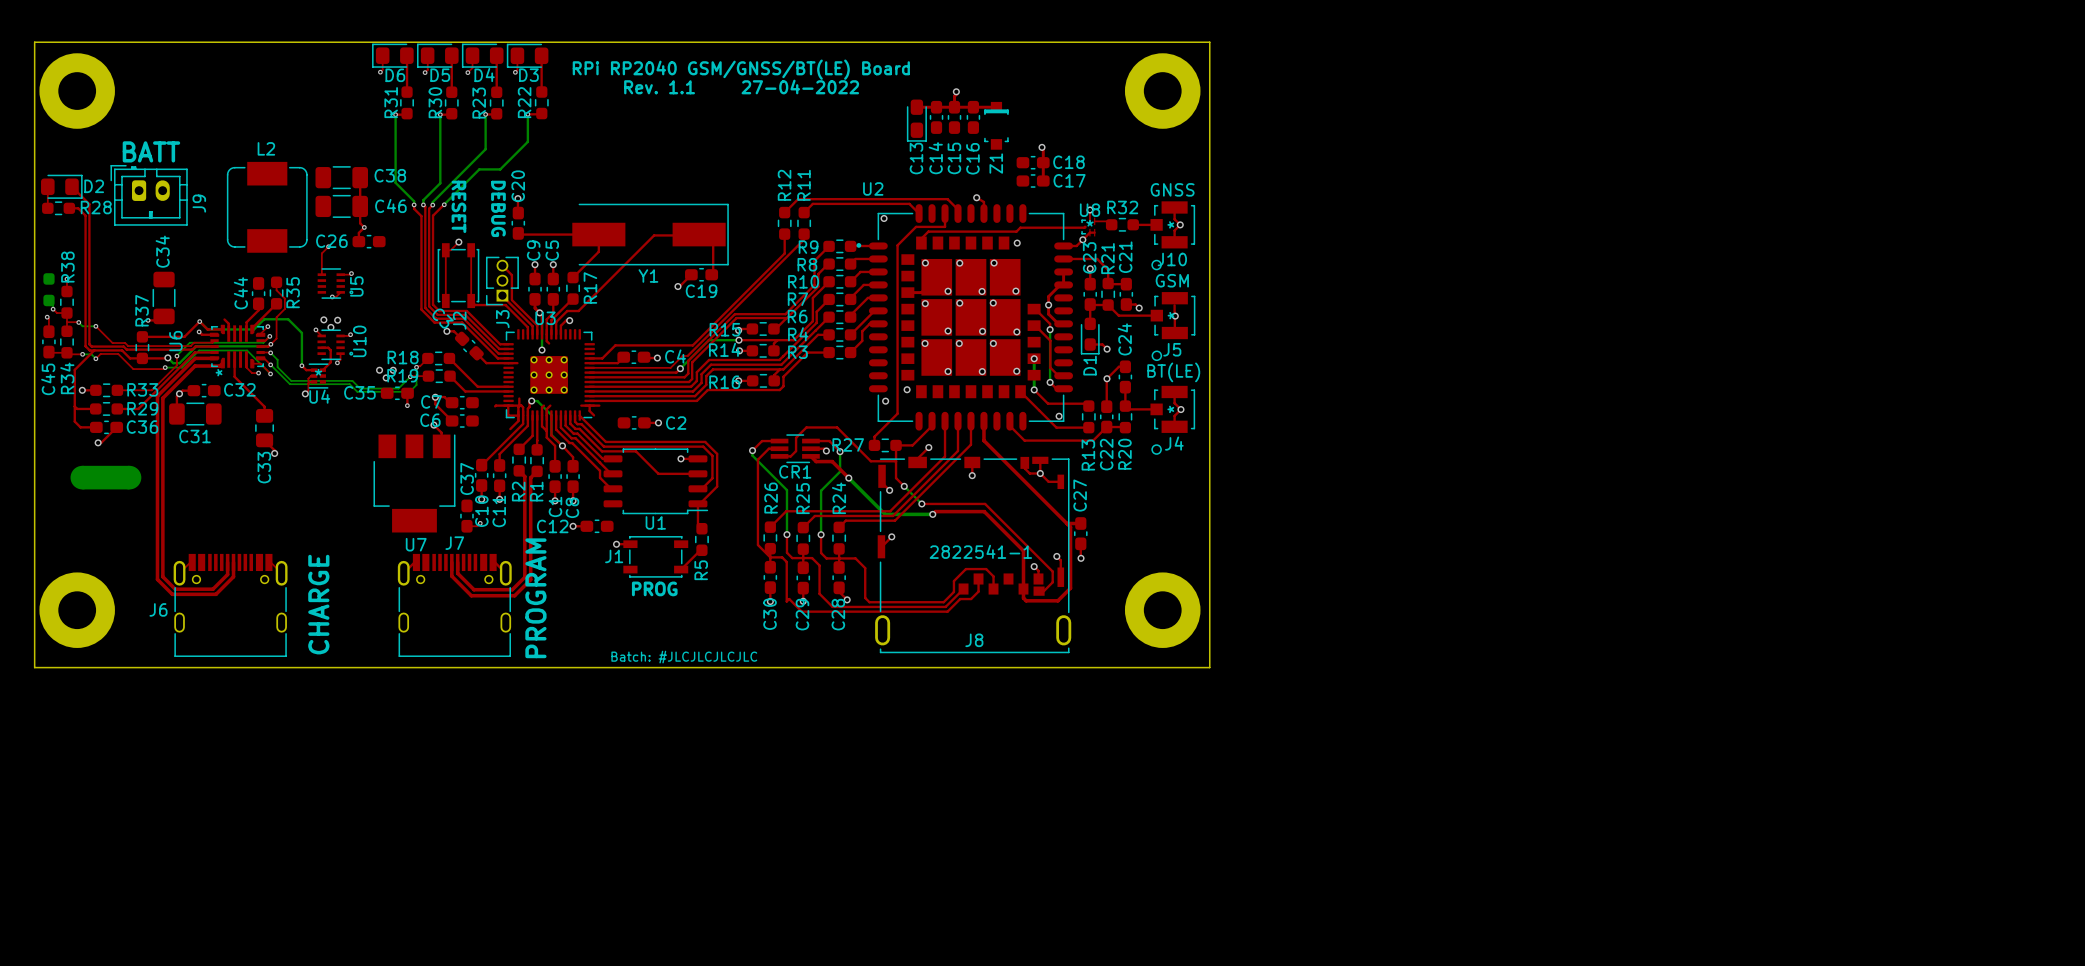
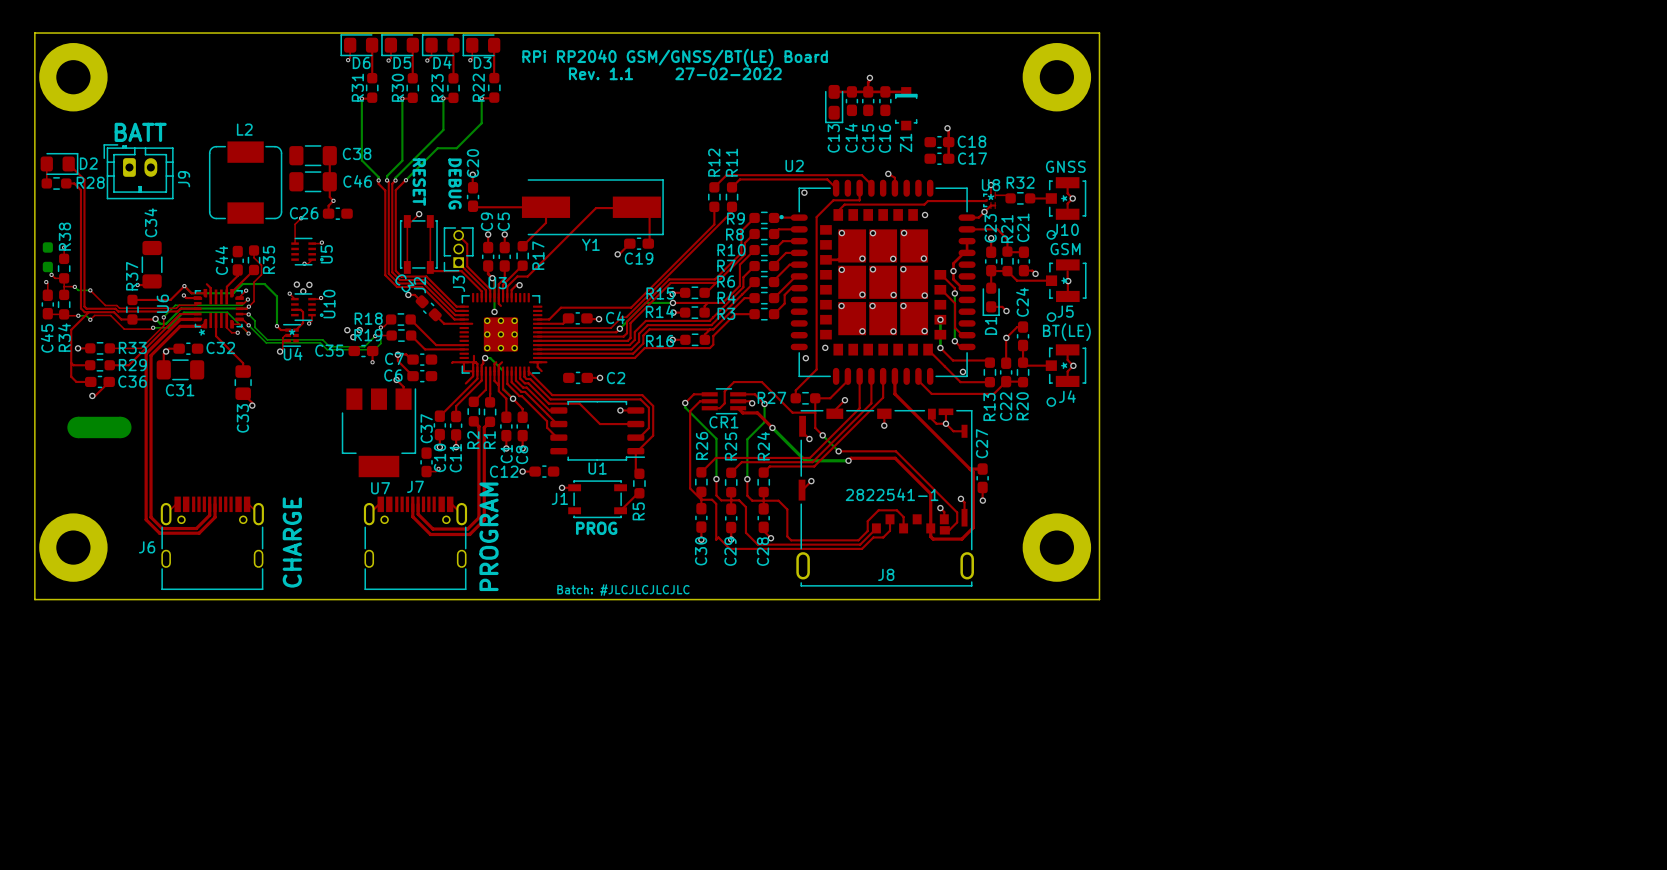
text: Rev. 1.1 27-04-2022 (741, 86) -> Rev. 1.1 27-02-2022 (675, 73)

